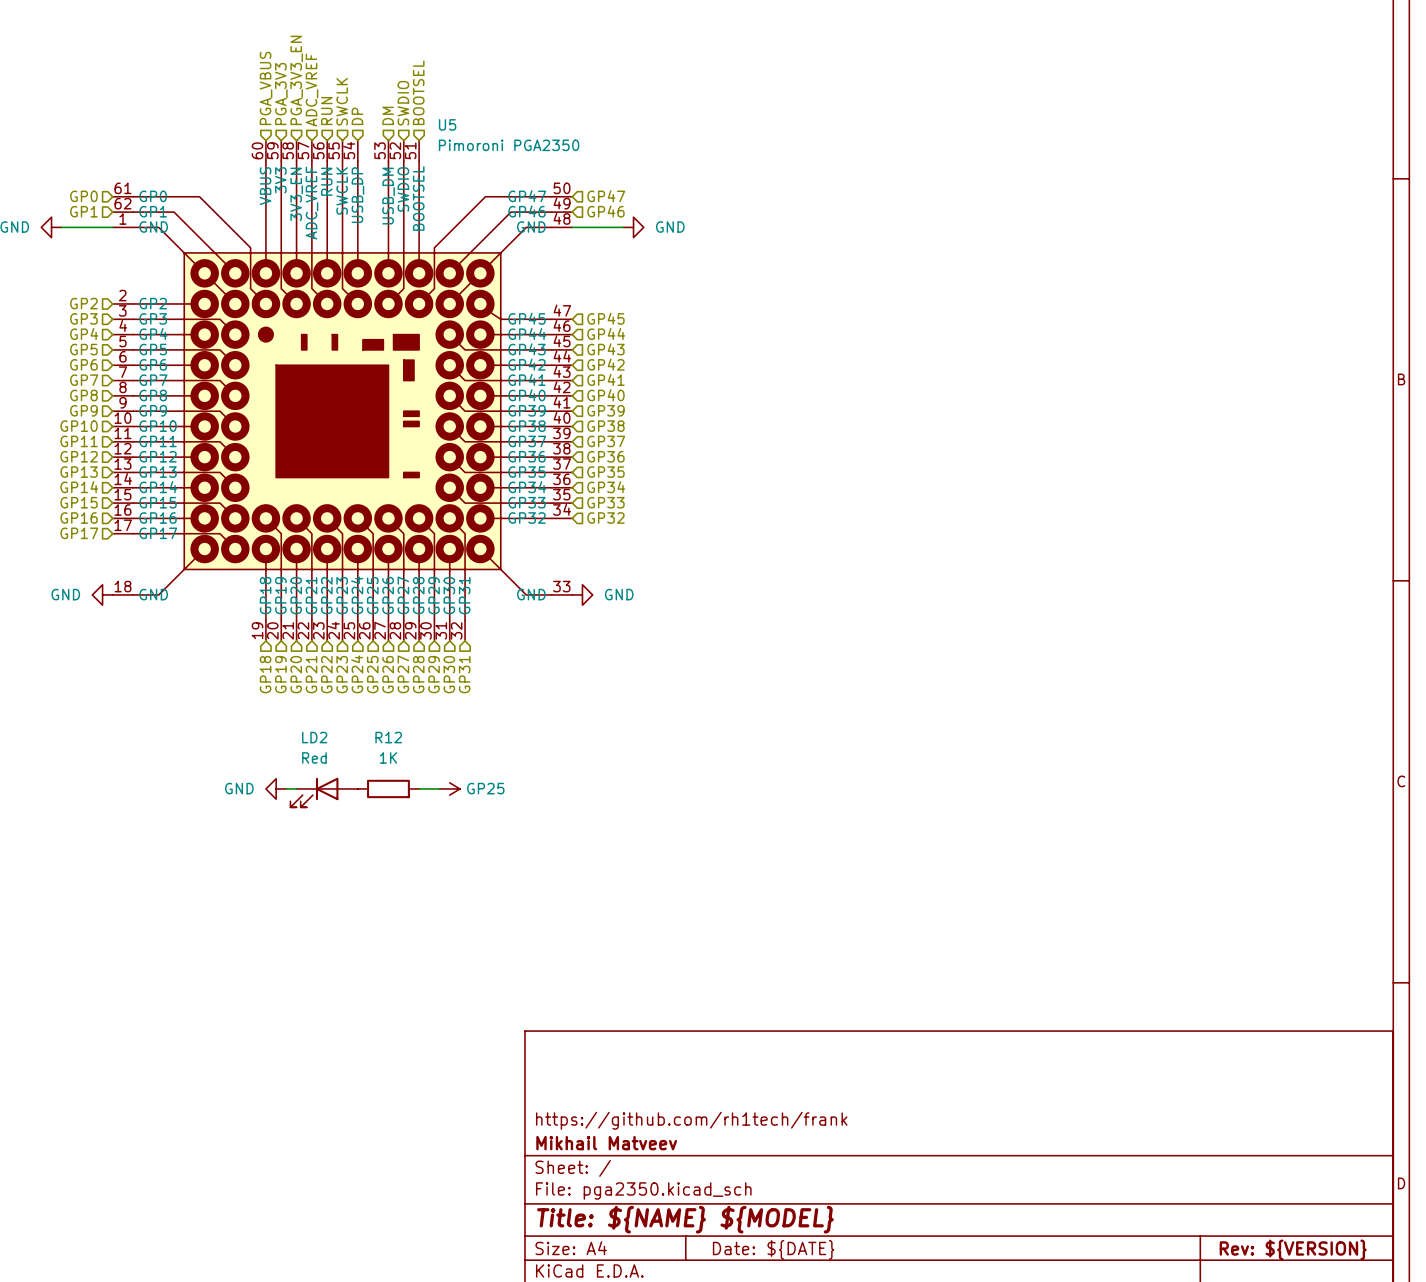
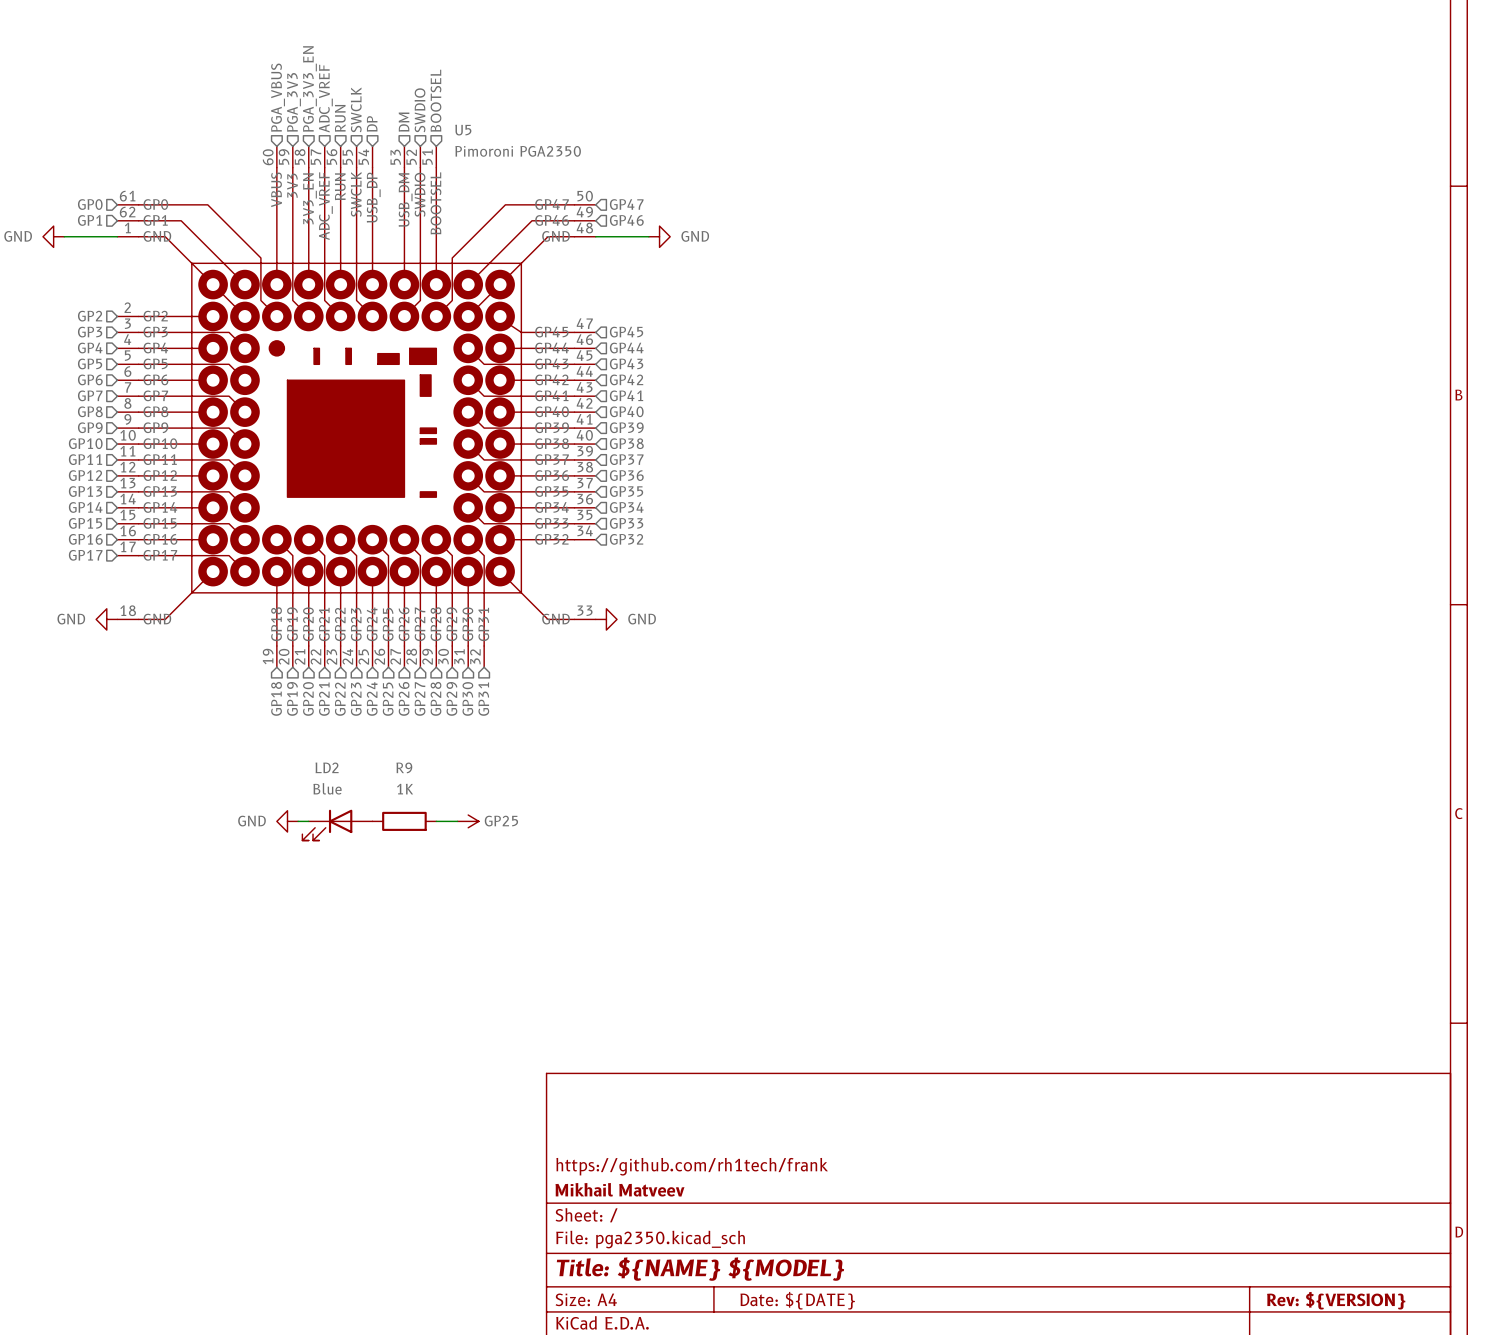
R12 name: R12 (388, 737) -> R9 (404, 767)
LD2 value: Red (314, 757) -> Blue (327, 788)

